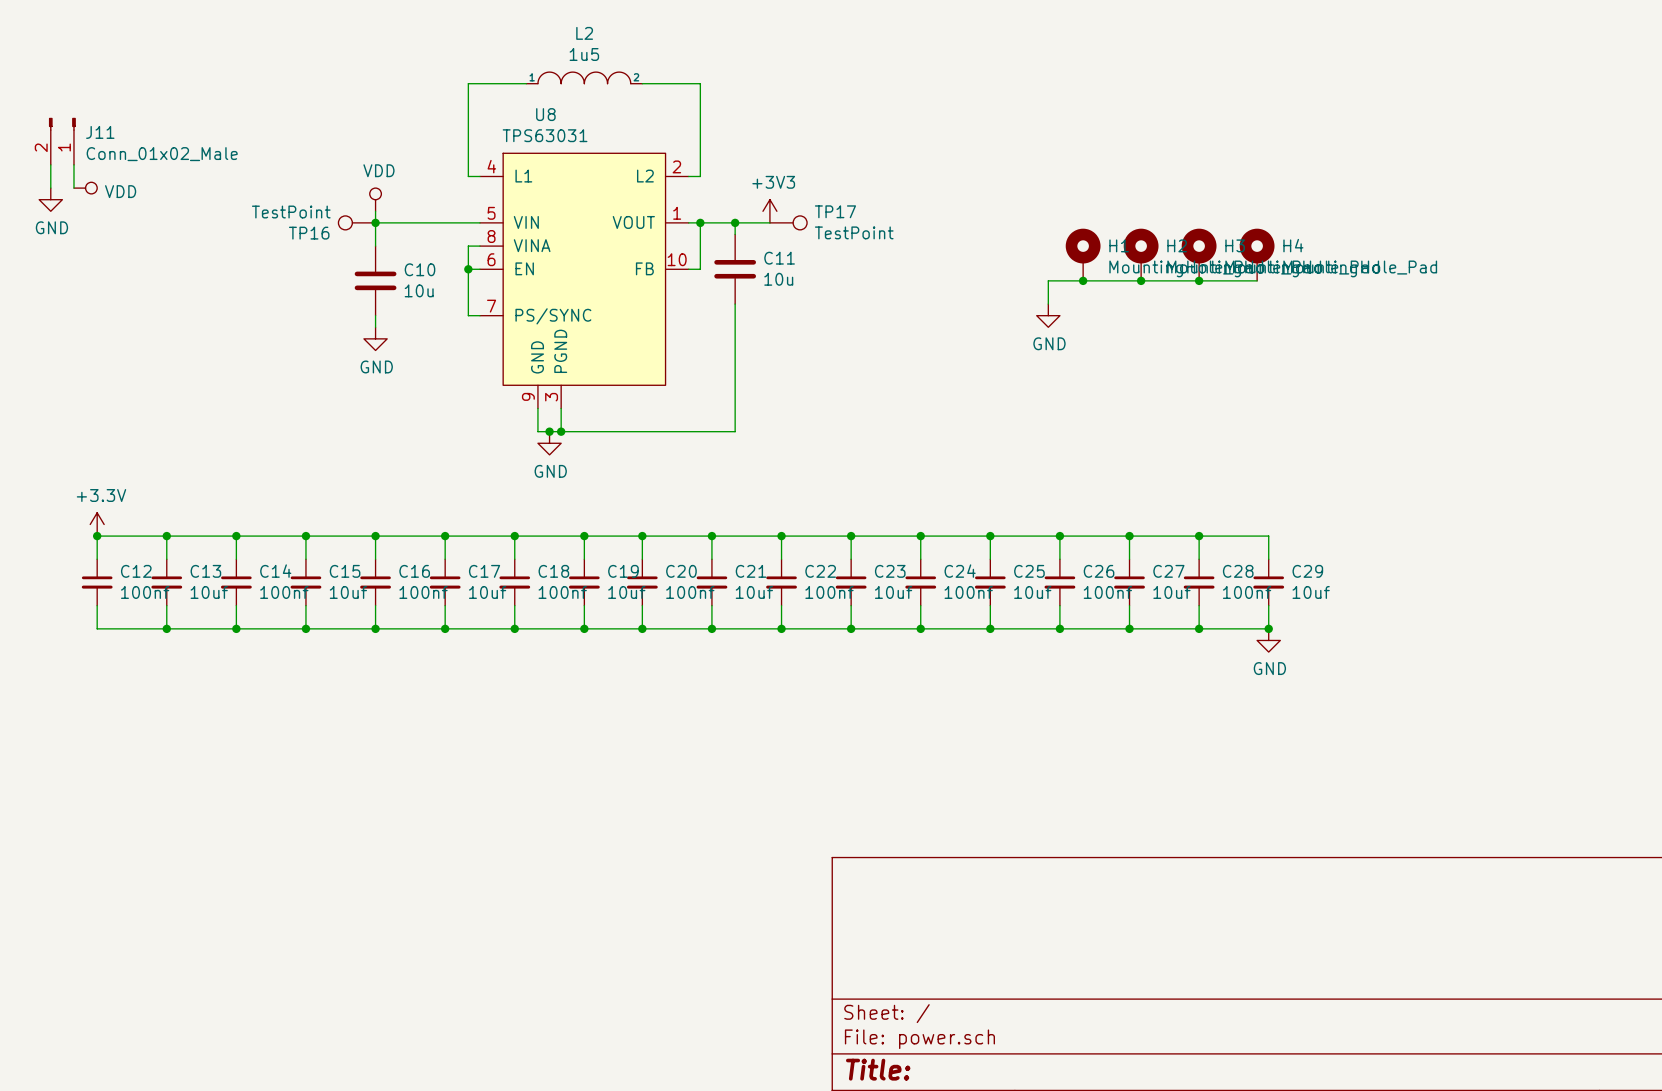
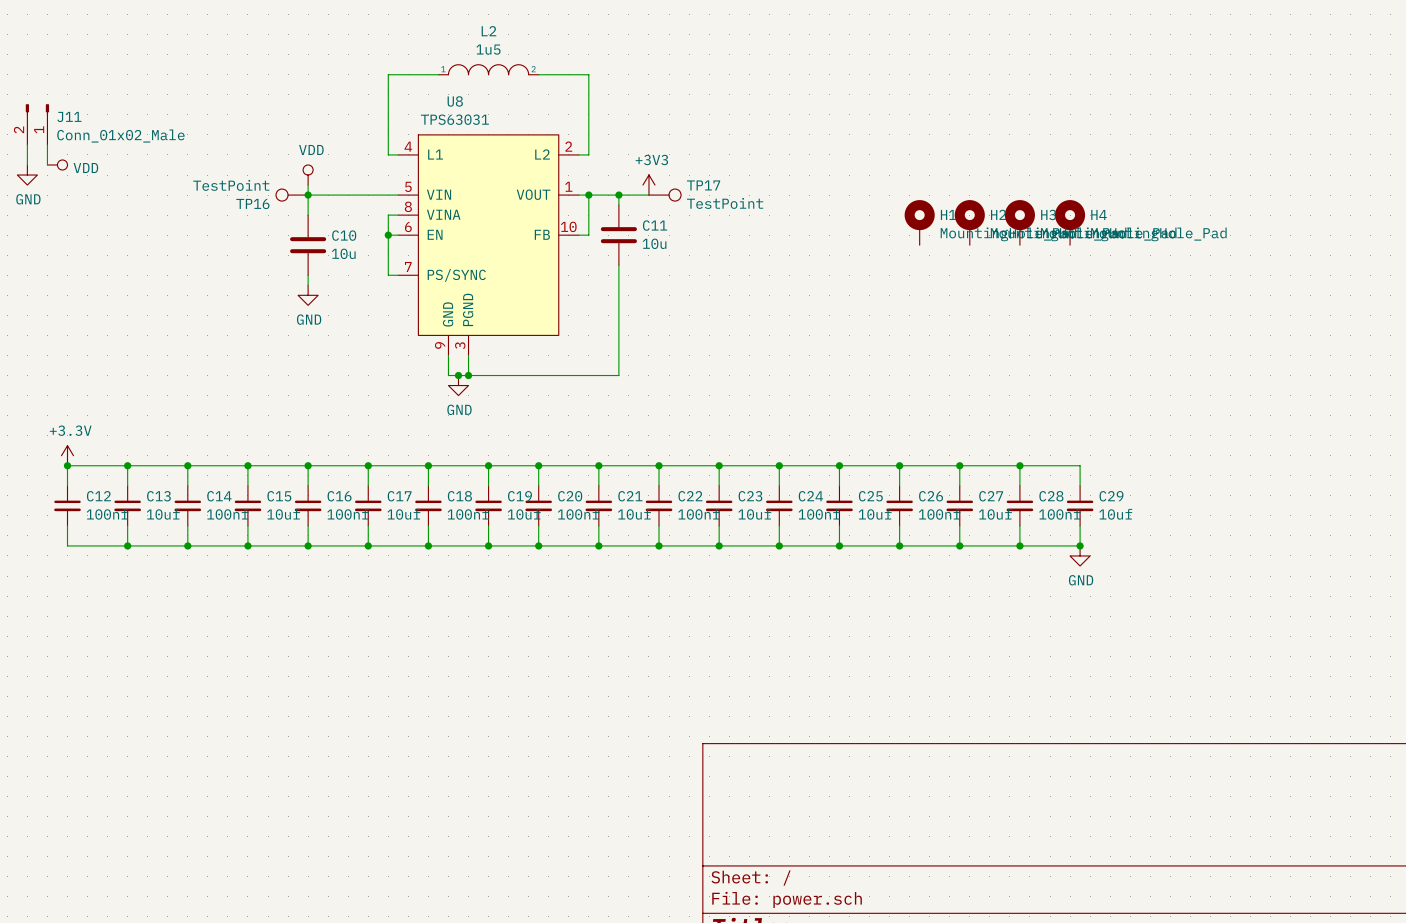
junction: (1083, 280) -> none
junction: (1141, 280) -> none
junction: (1199, 280) -> none
wire: (1257, 280) (1048, 280) (1048, 304) -> none
power symbol: GND (1048, 315) -> none

